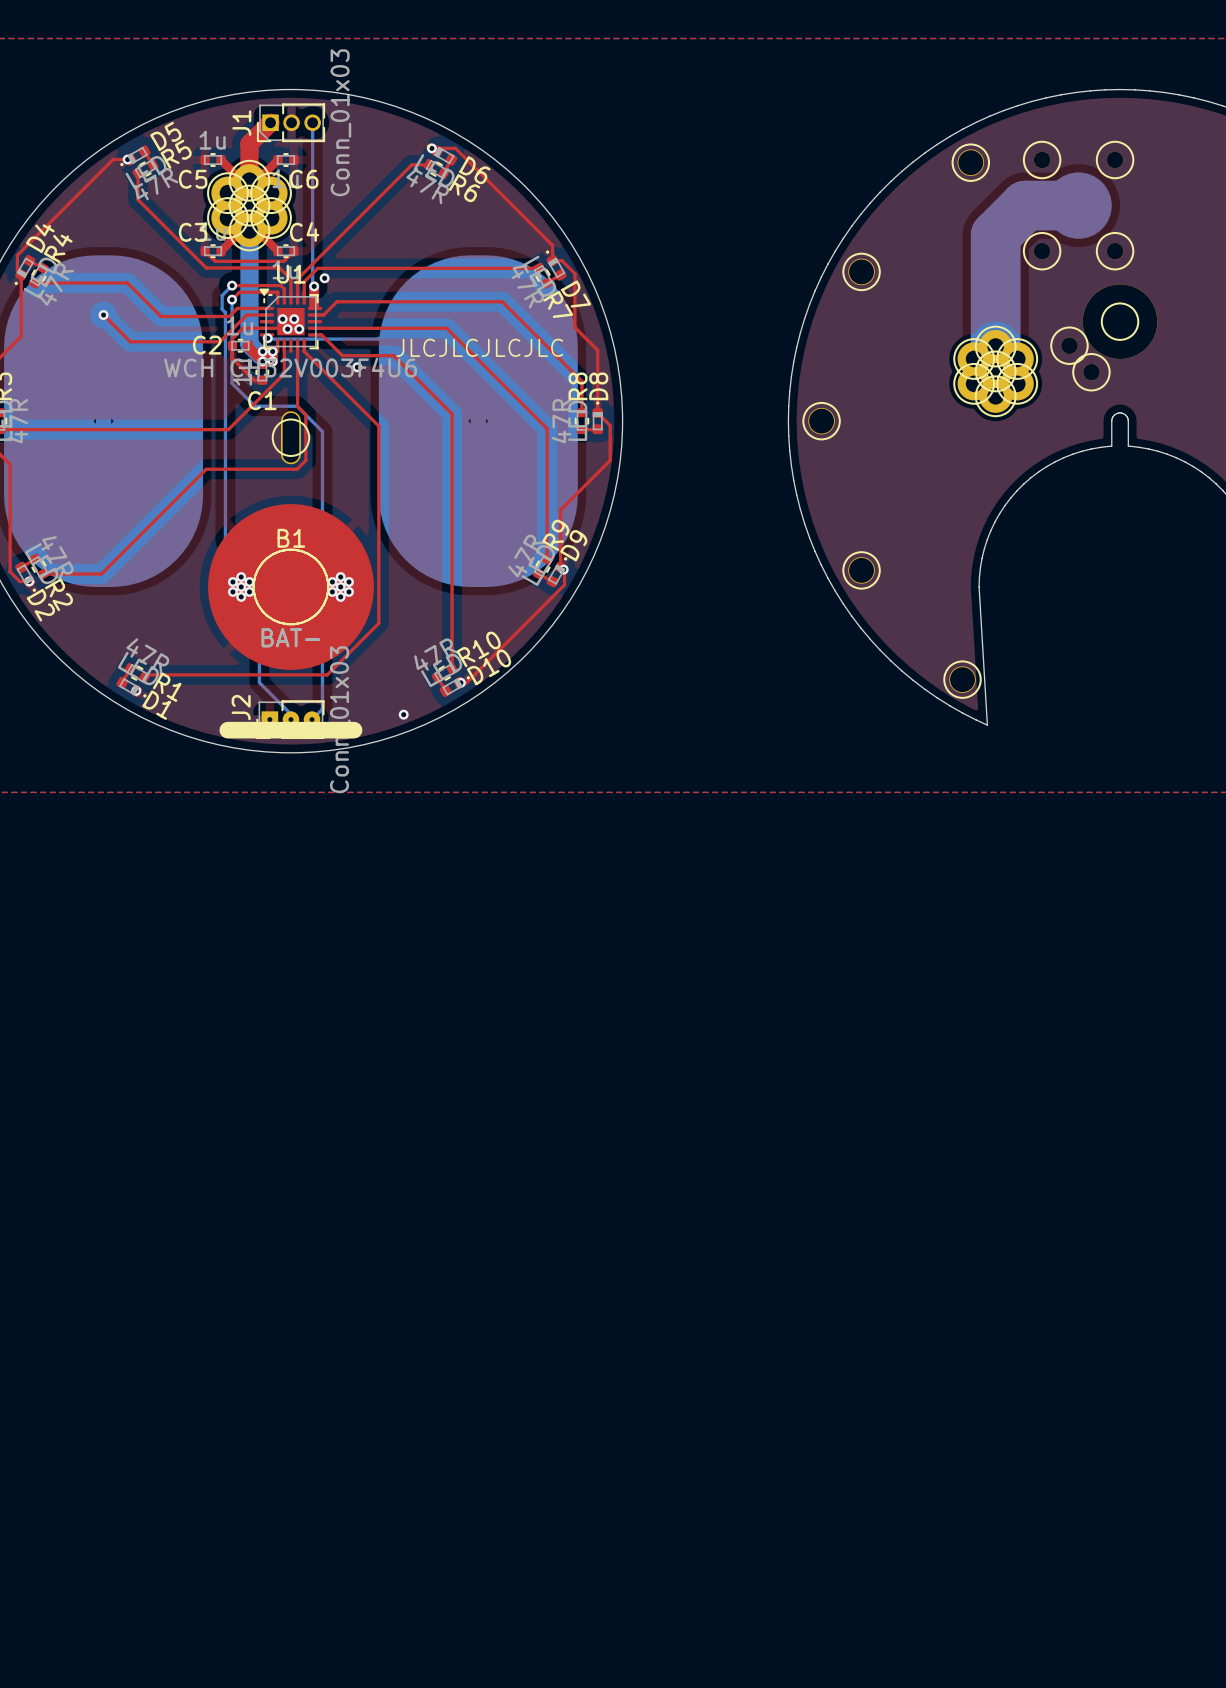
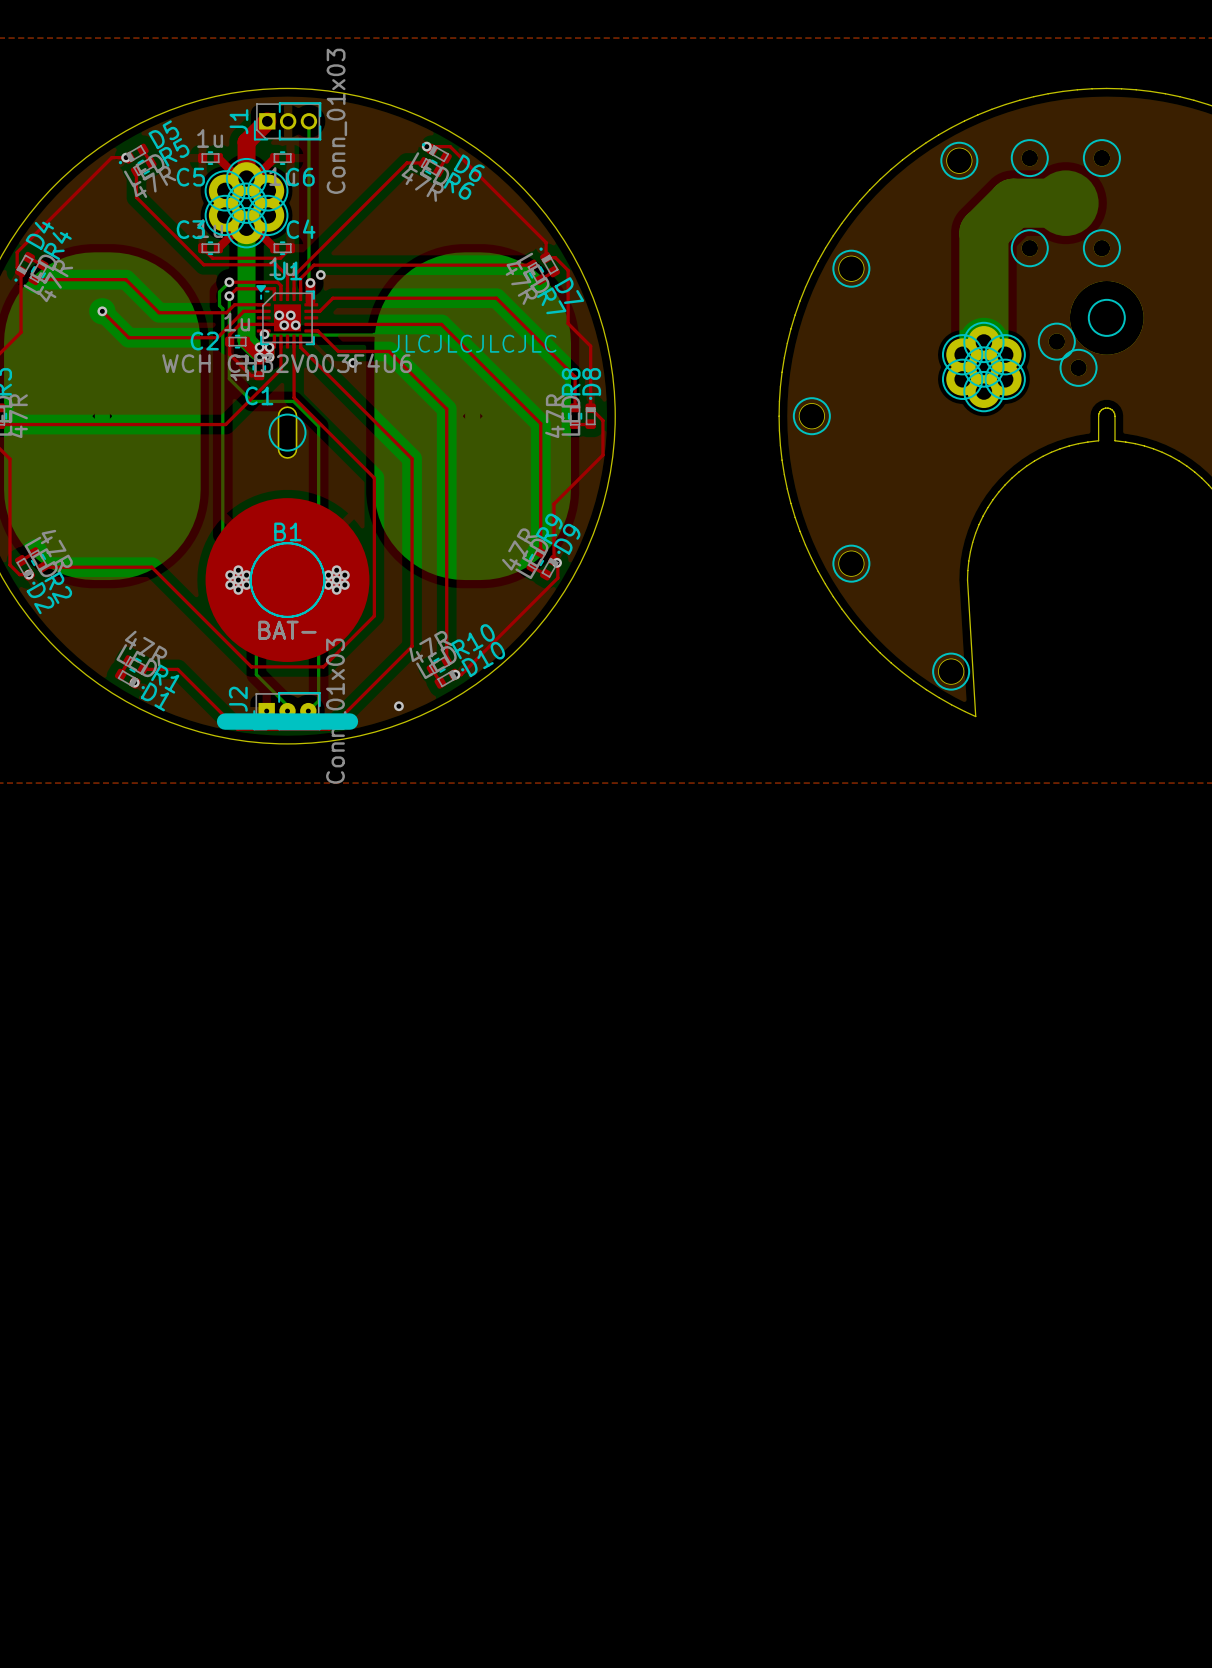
top track: (297, 402) (297, 406) (305, 414) (305, 460) (297, 469) (206, 469) (101, 573) -> none
top track: (378, 426) (378, 483) -> (294, 397) (374, 478)
top track: none -> (374, 421) (412, 458) (412, 646) (329, 729) (237, 729) (177, 669) (142, 669)
top track: (254, 674) (147, 674) (144, 677) -> (251, 666) (151, 567) (100, 567)

